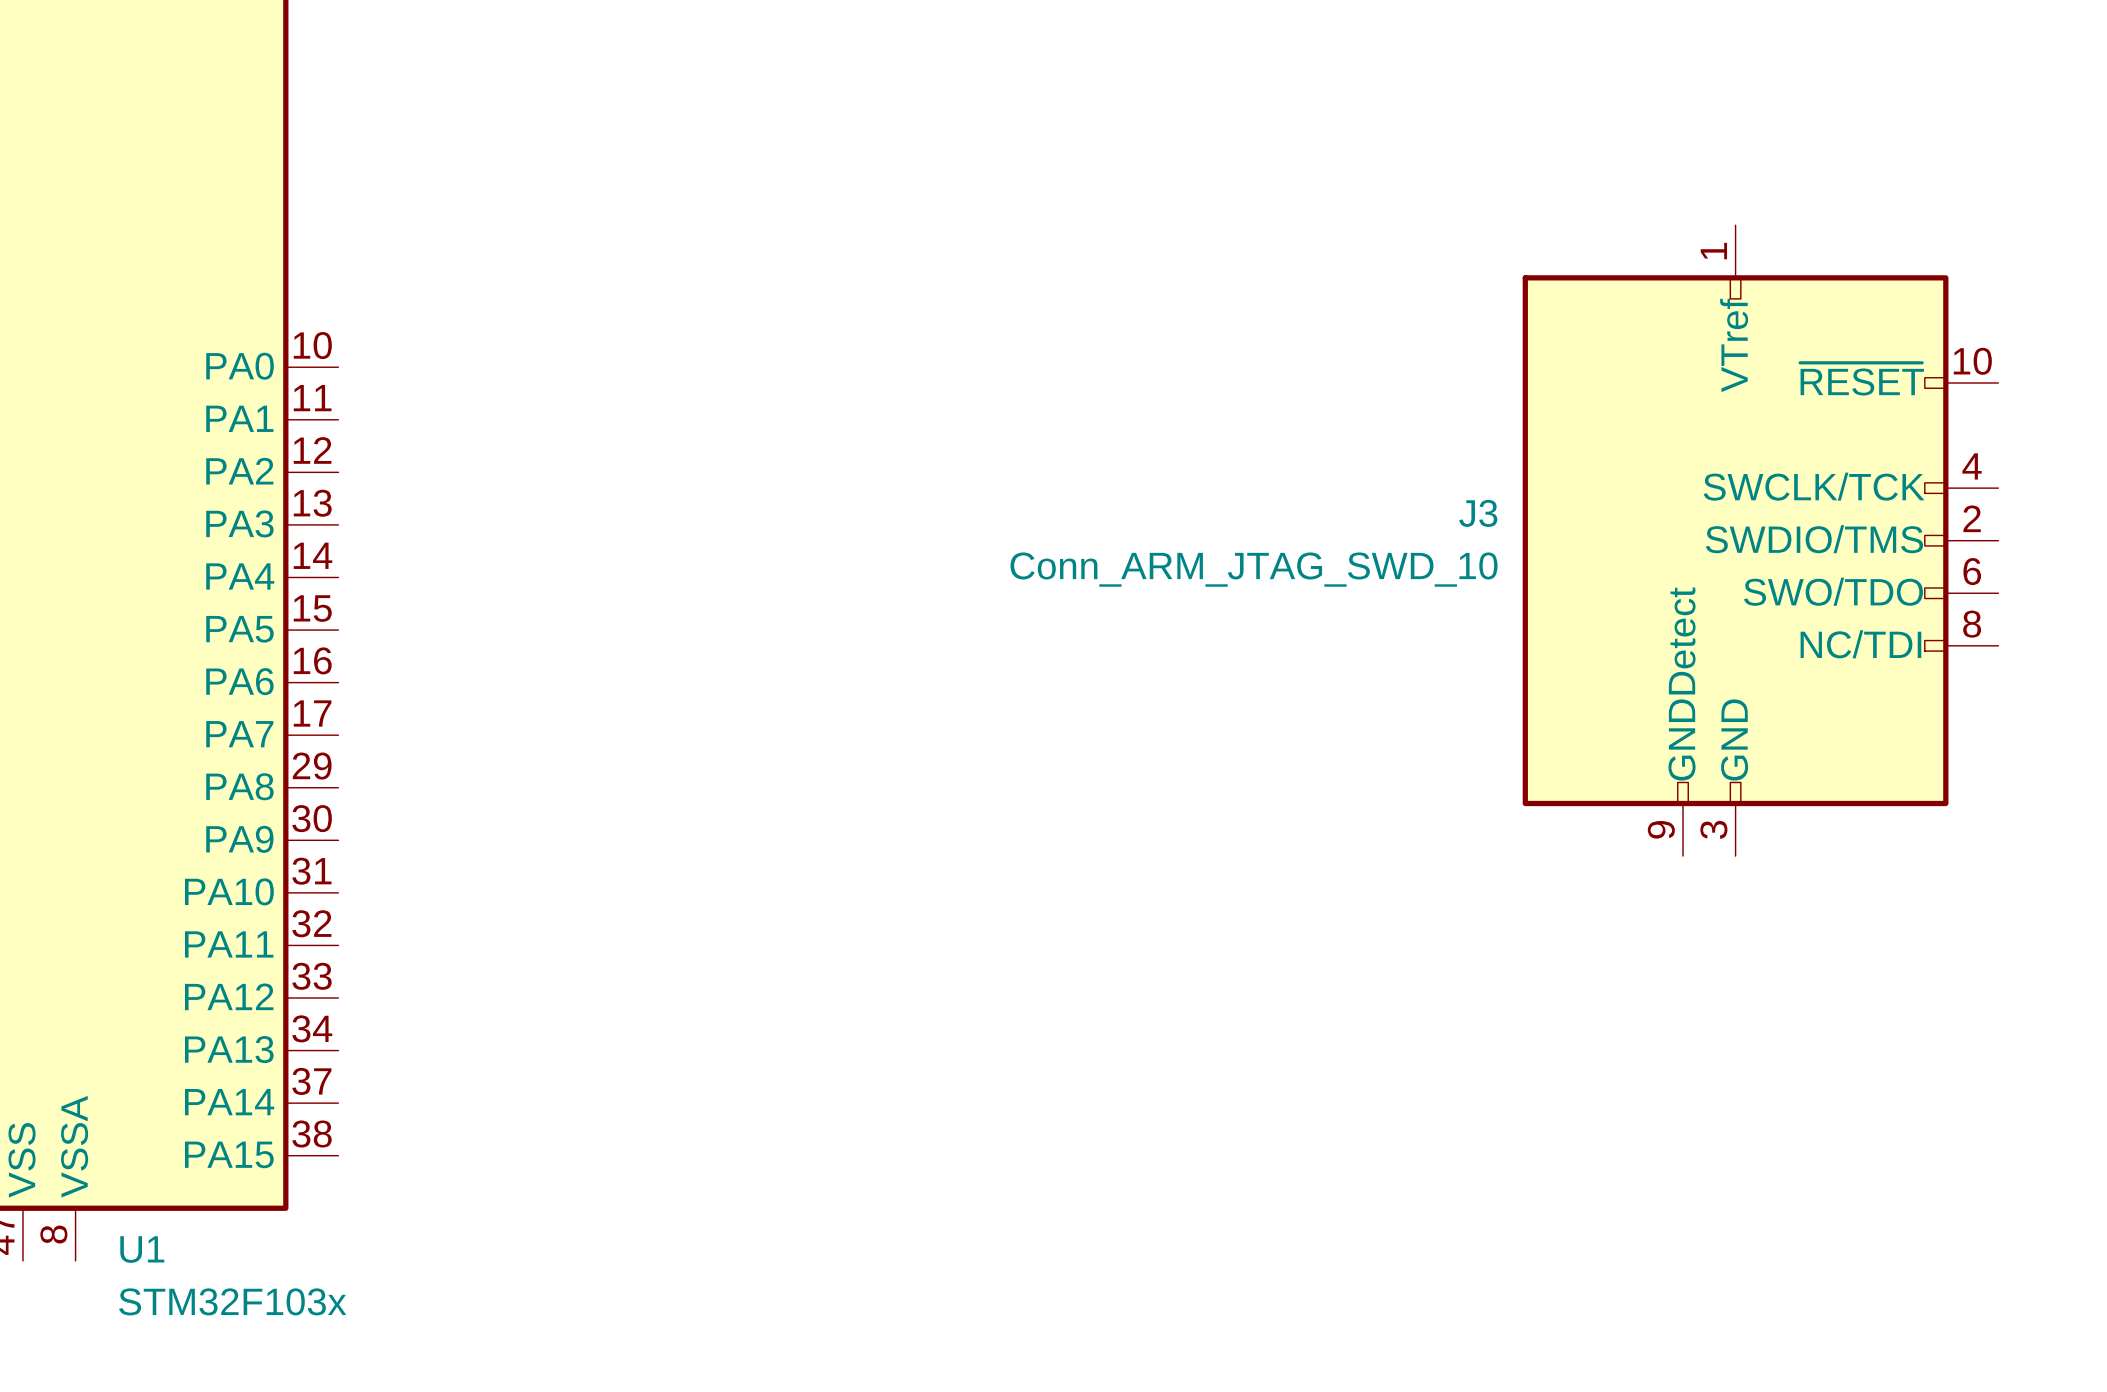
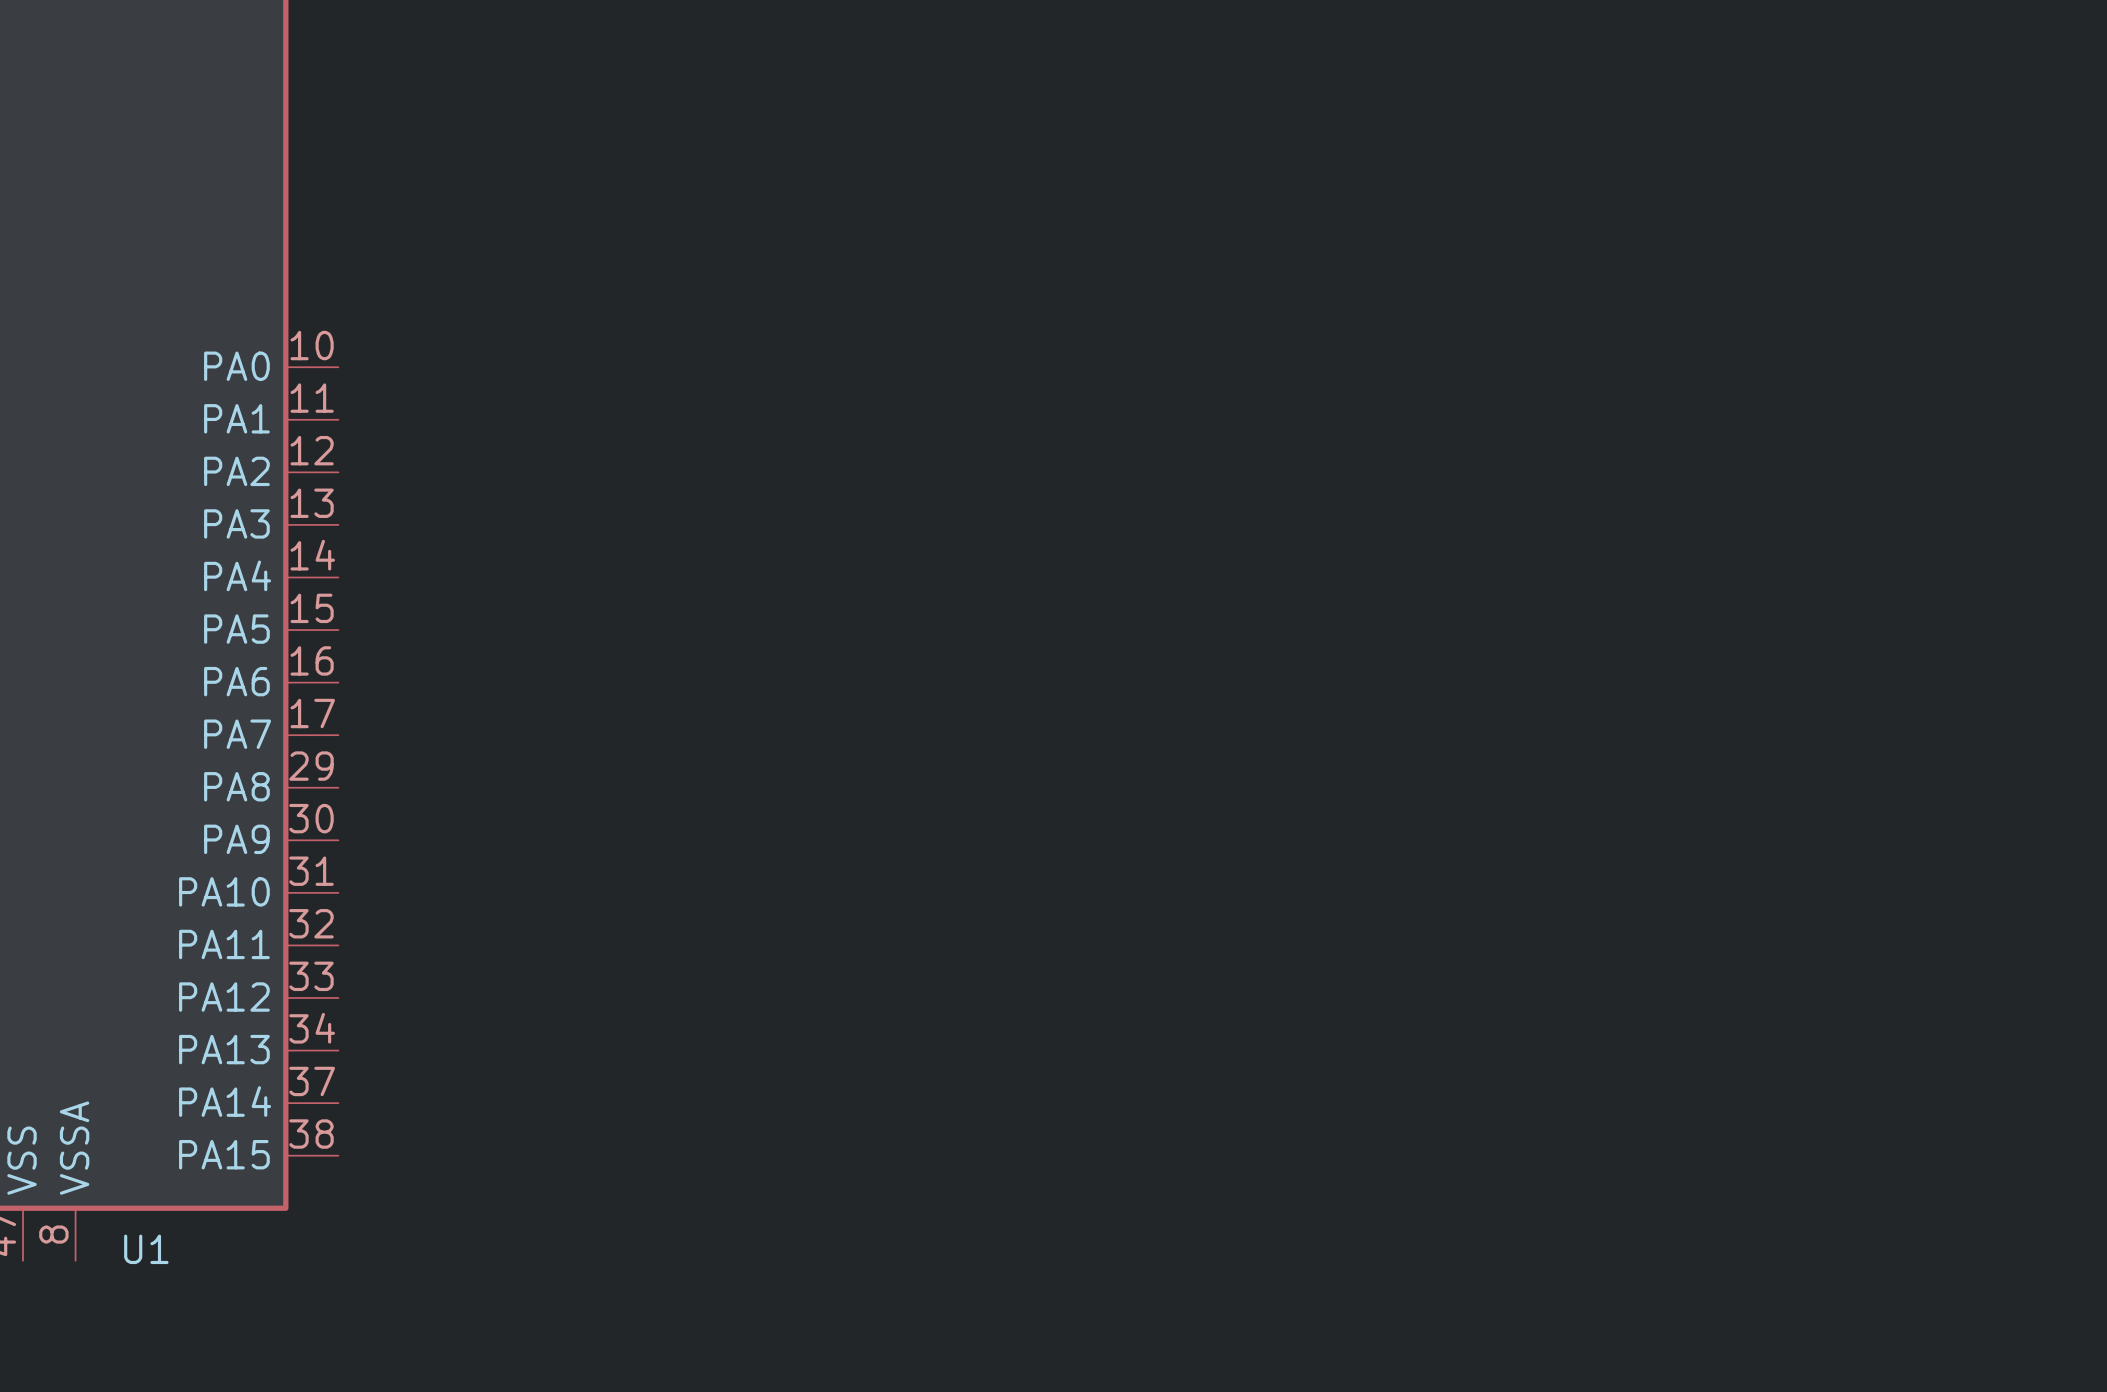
J3: Conn_ARM_JTAG_SWD_10 (1760, 540) -> none
U1 value: STM32F103x (232, 1301) -> none

